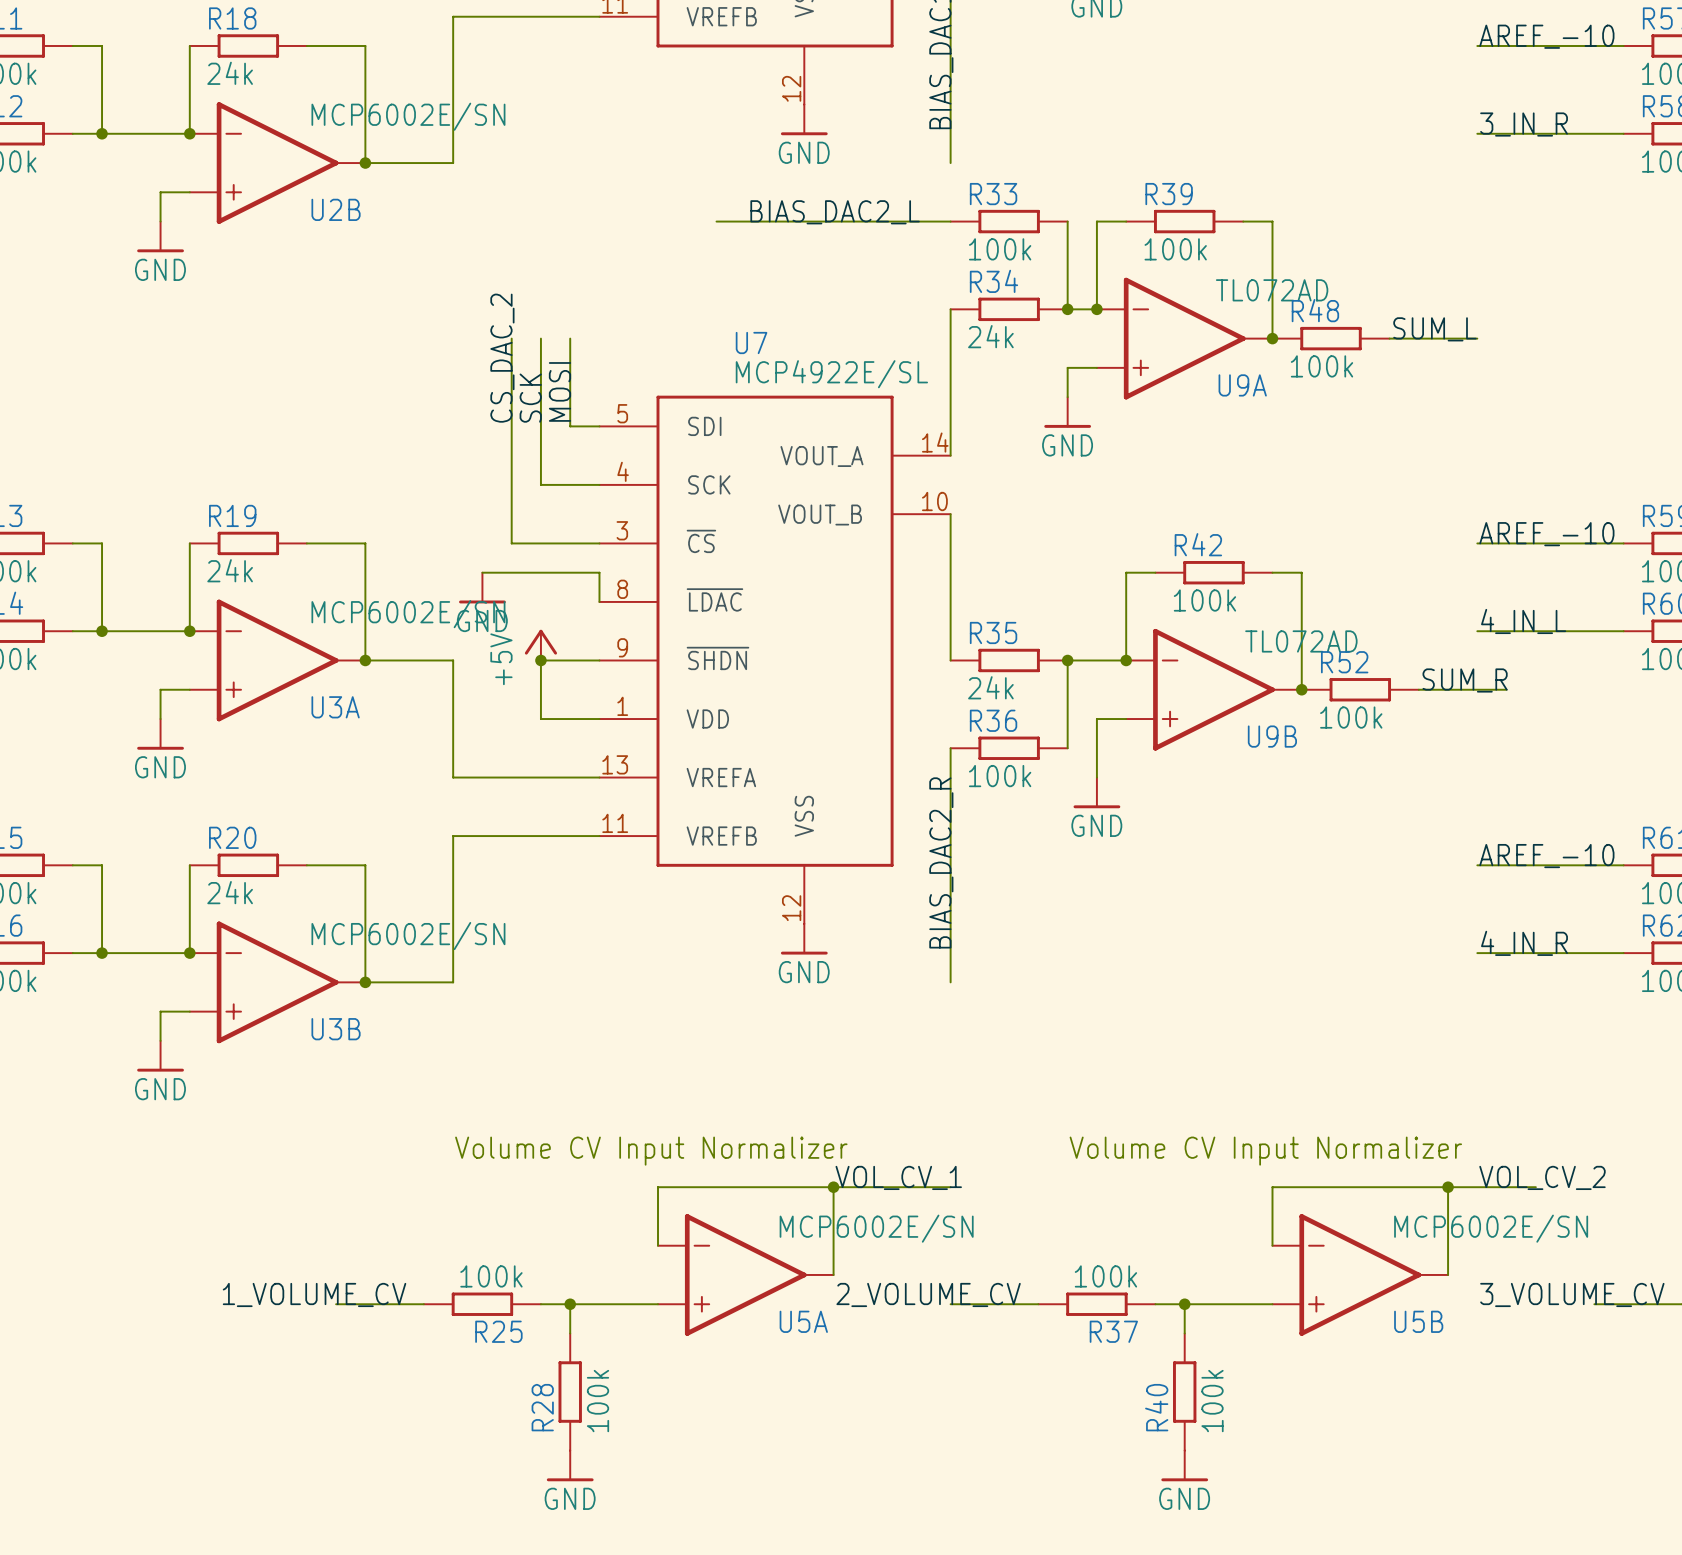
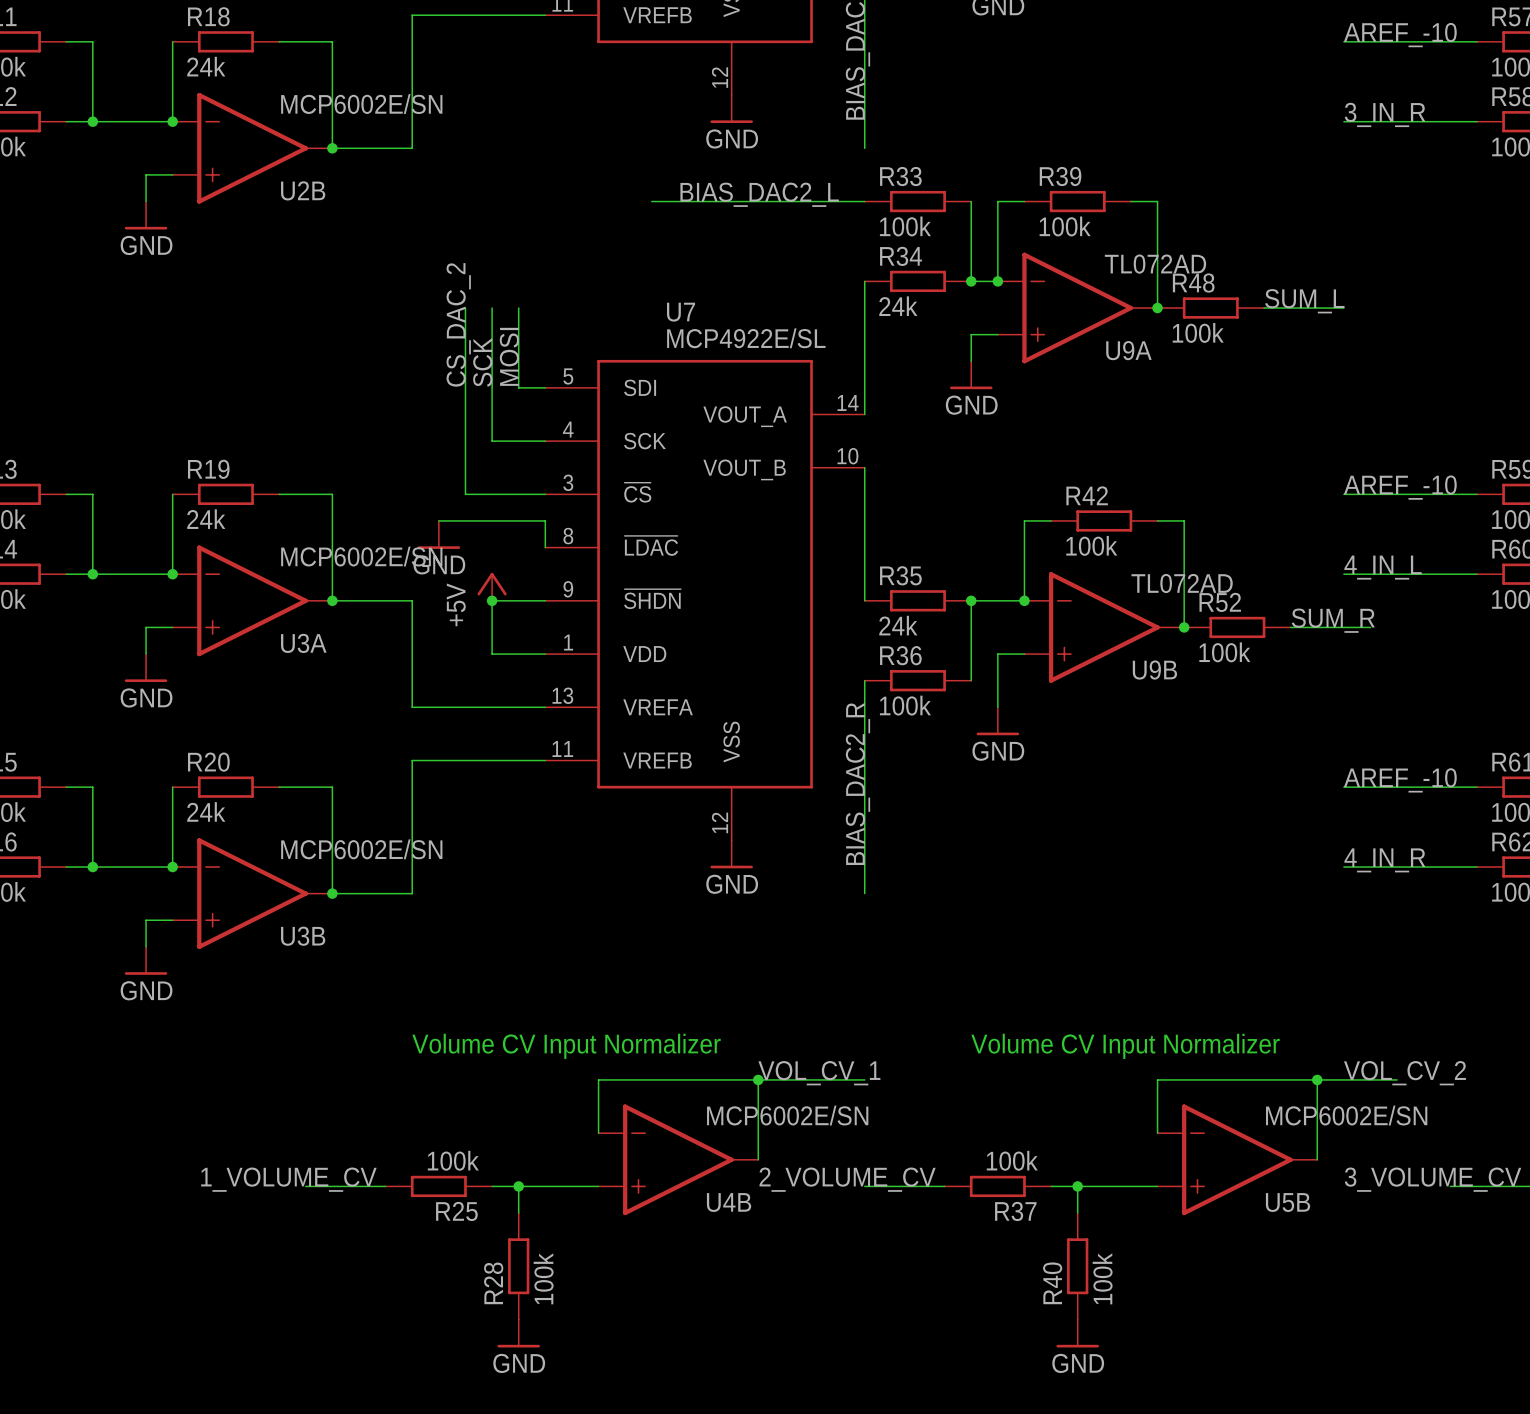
U5A name: U5A (803, 1321) -> U4B (729, 1202)

